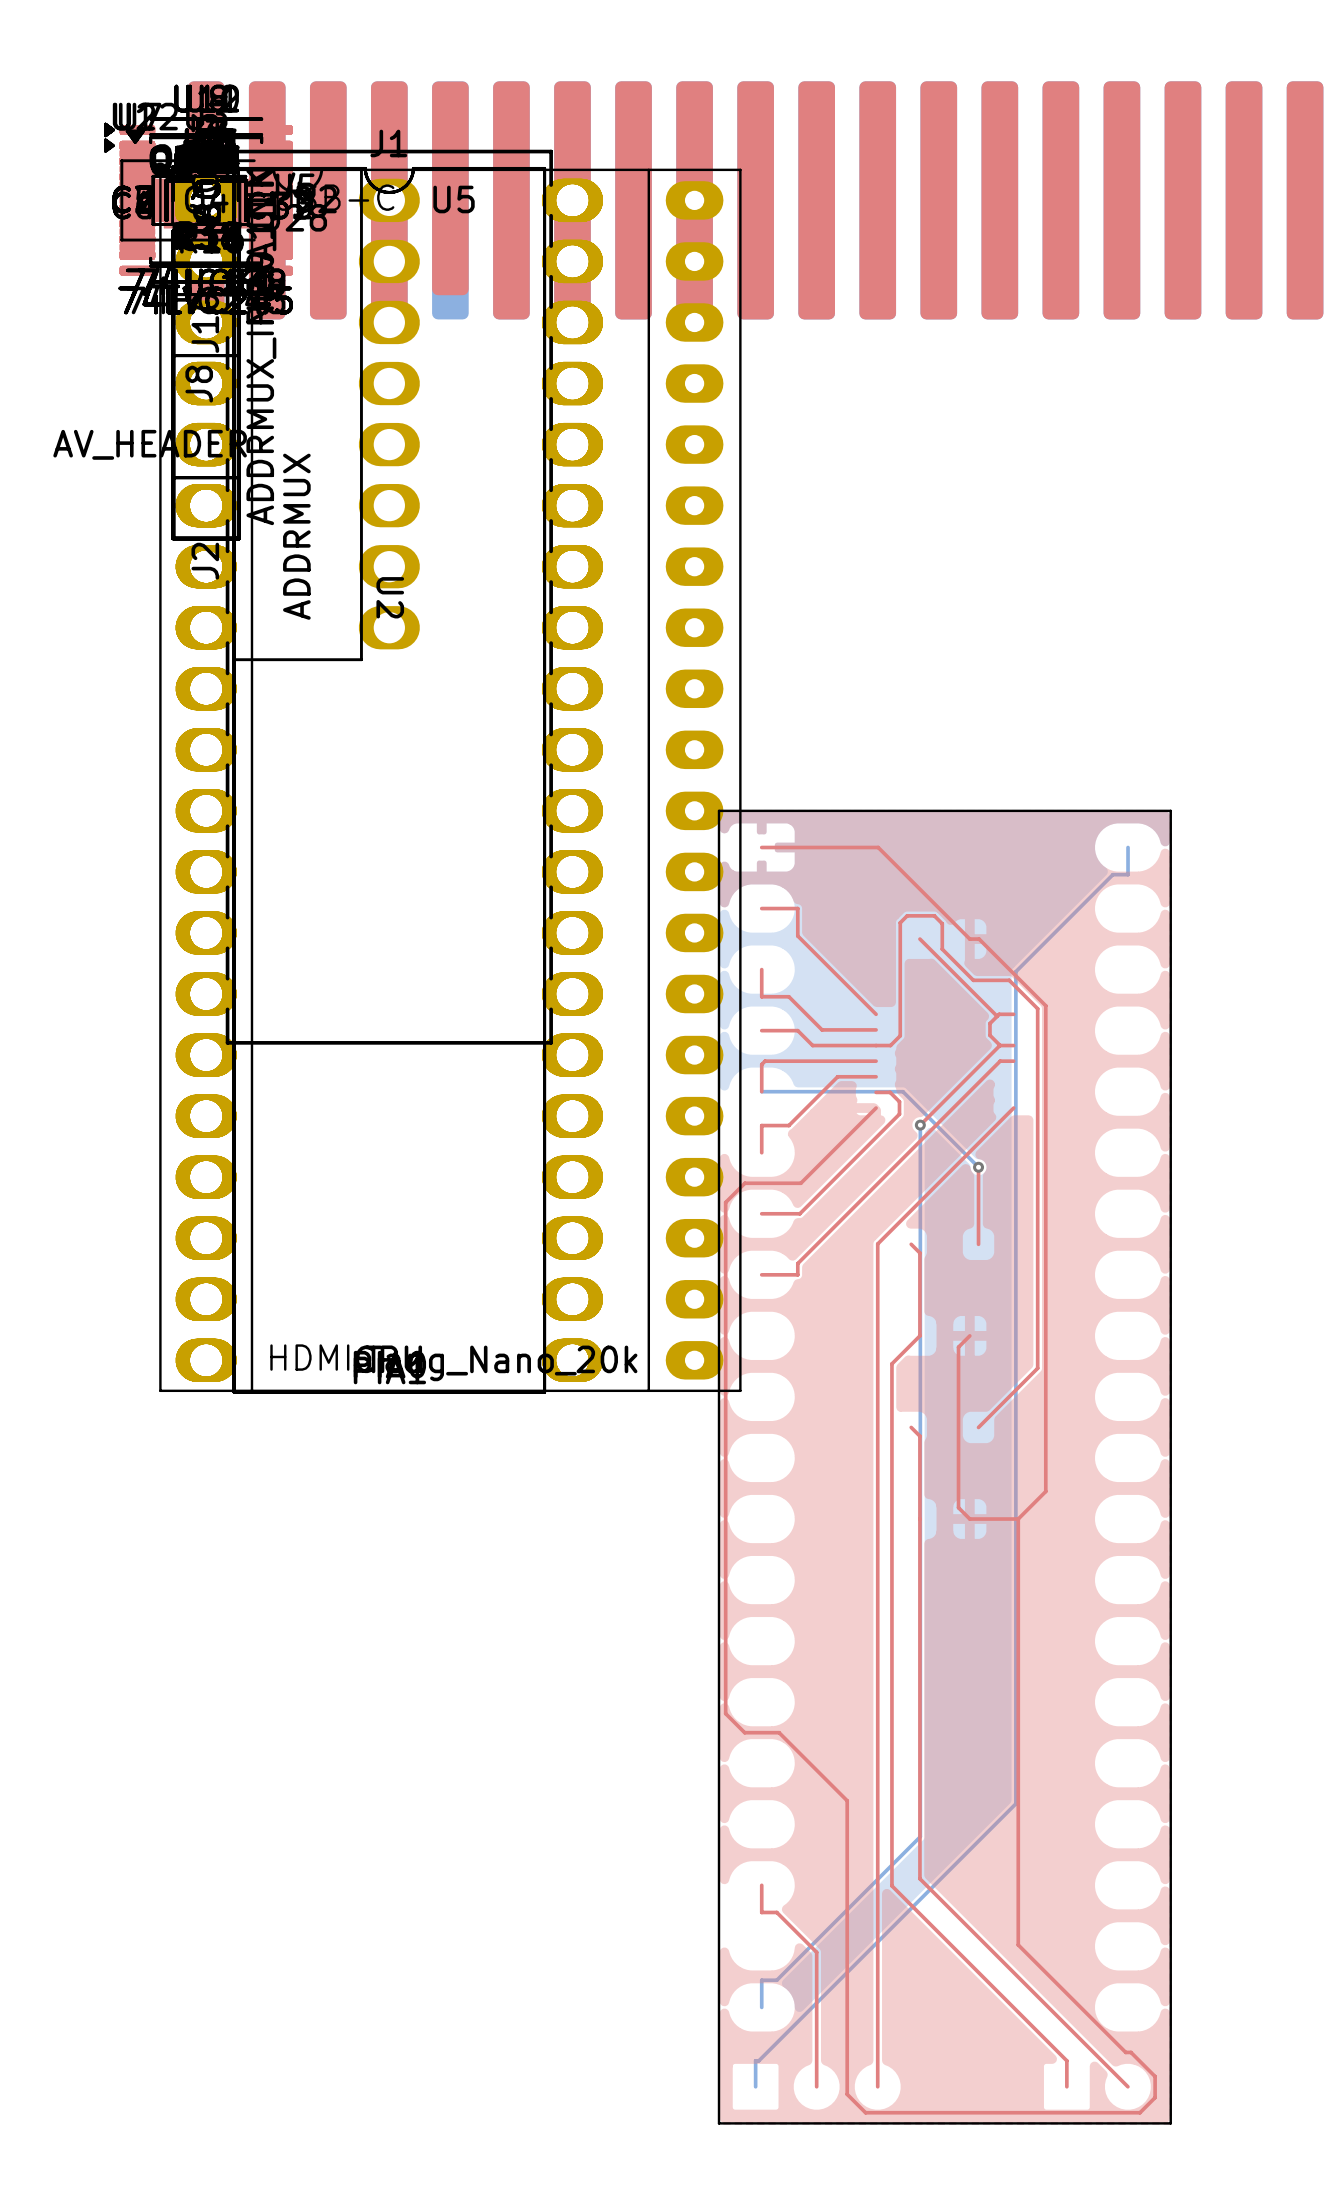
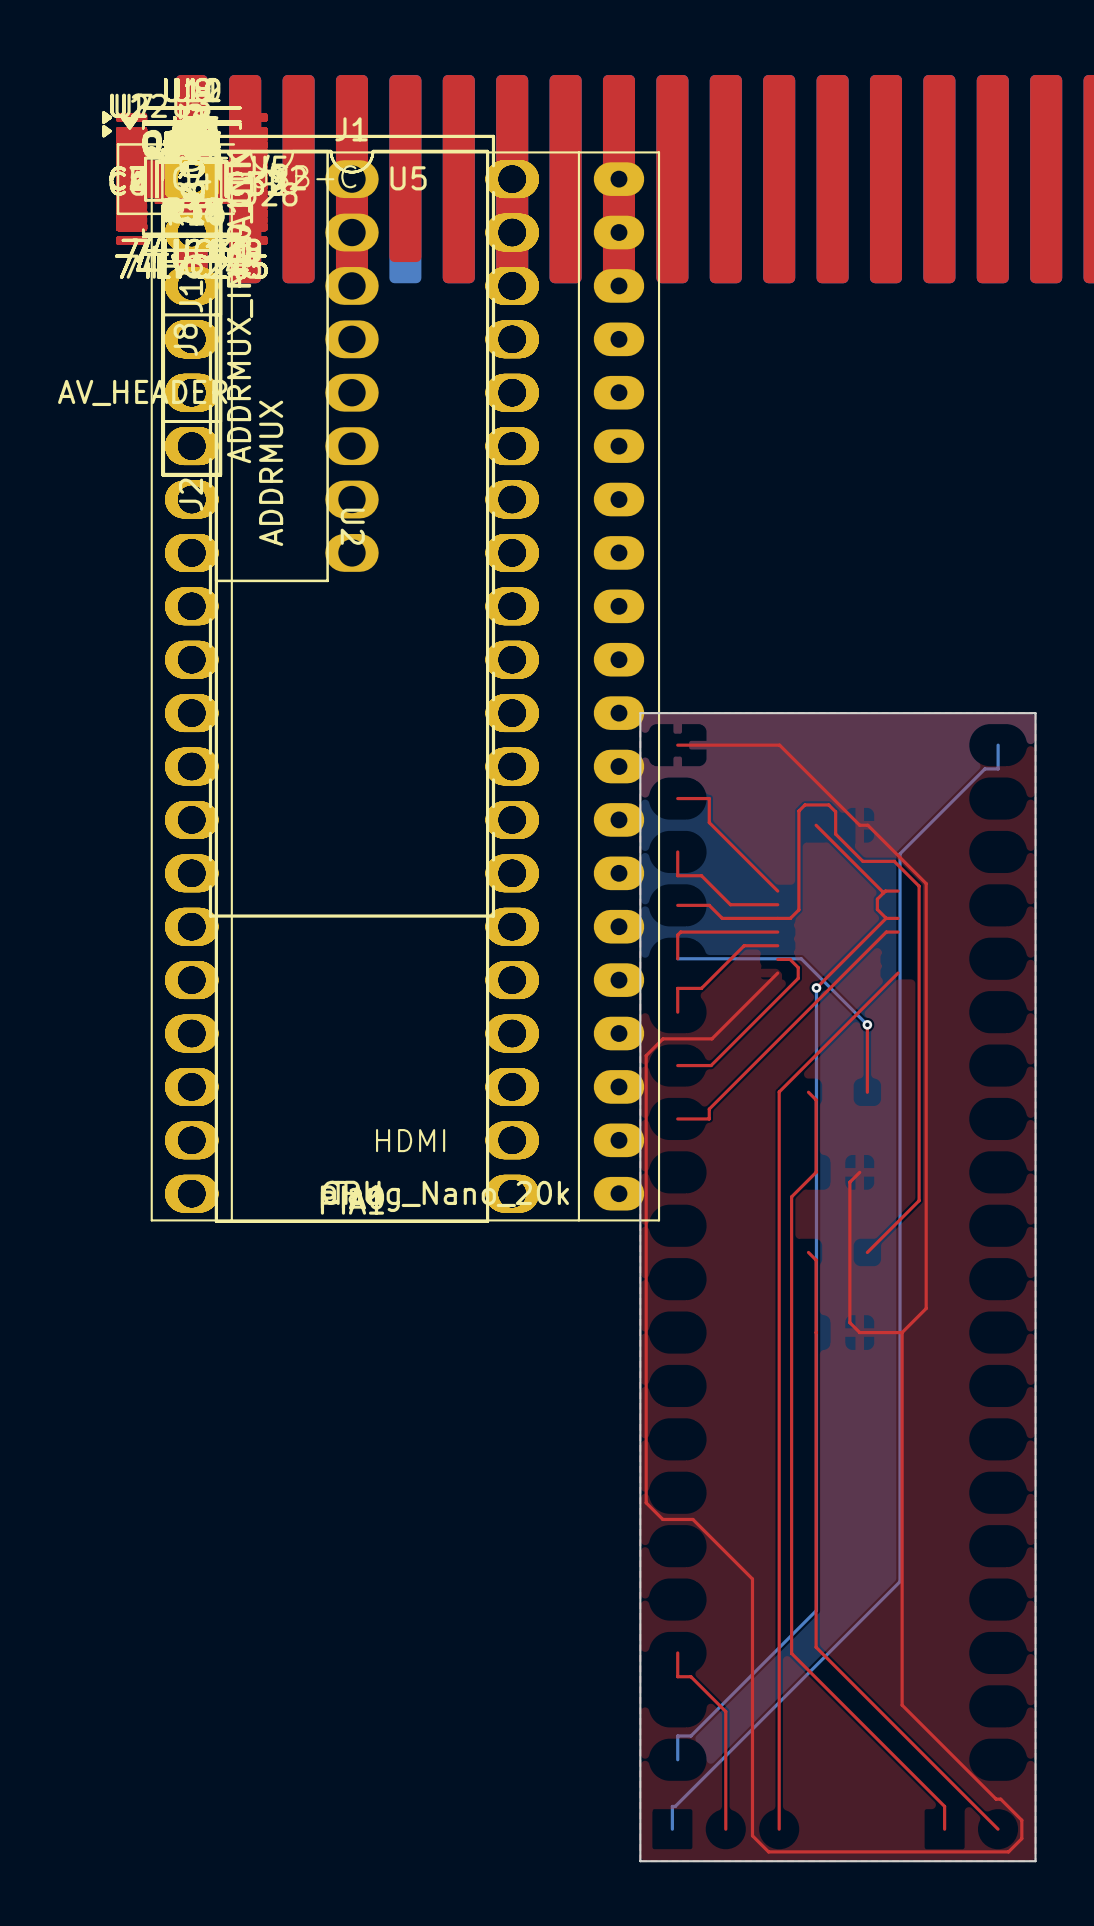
U5 text position: HDMI (309, 1357) -> HDMI (410, 1140)

